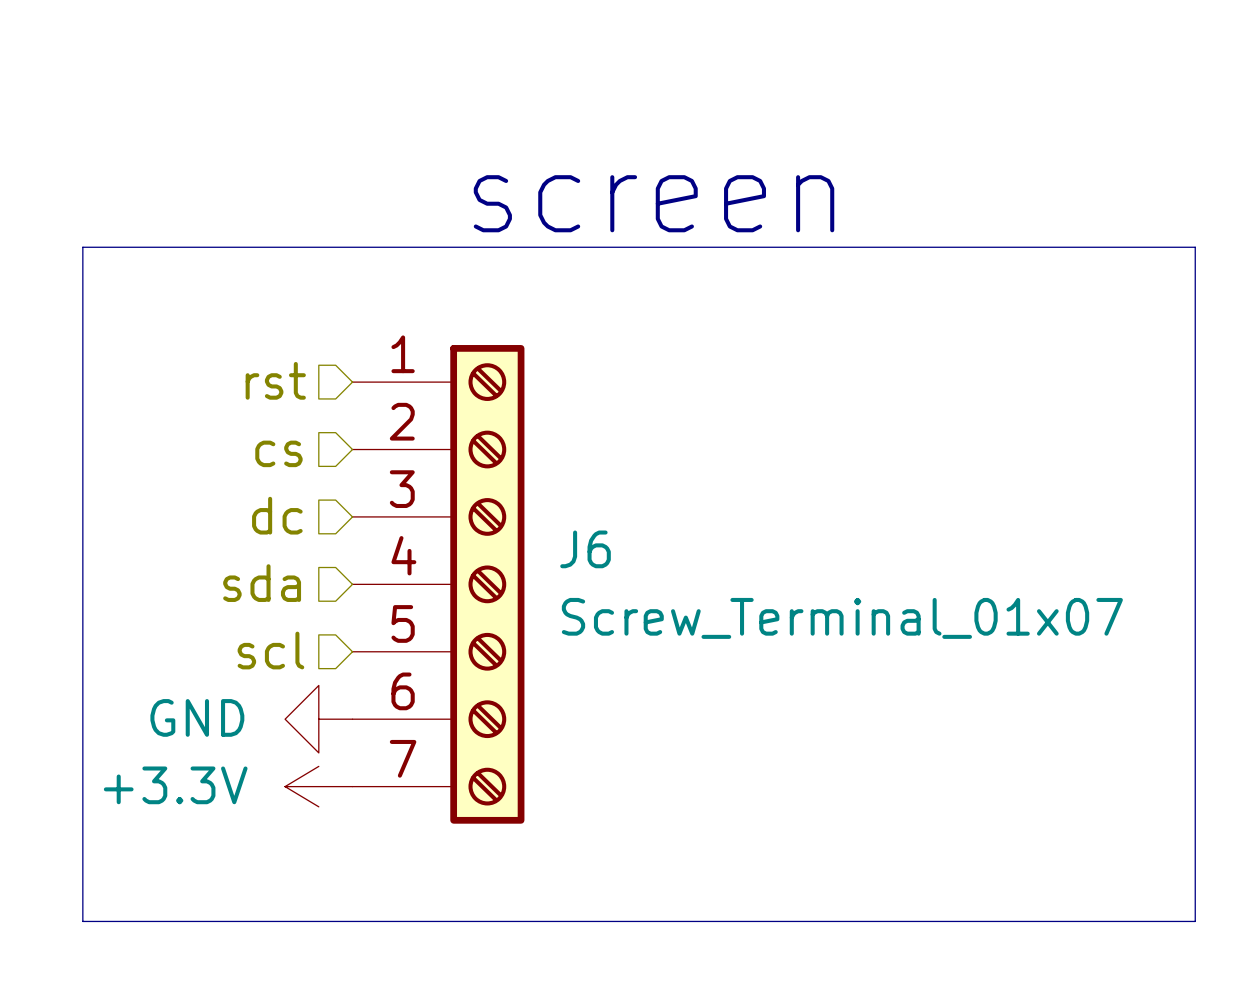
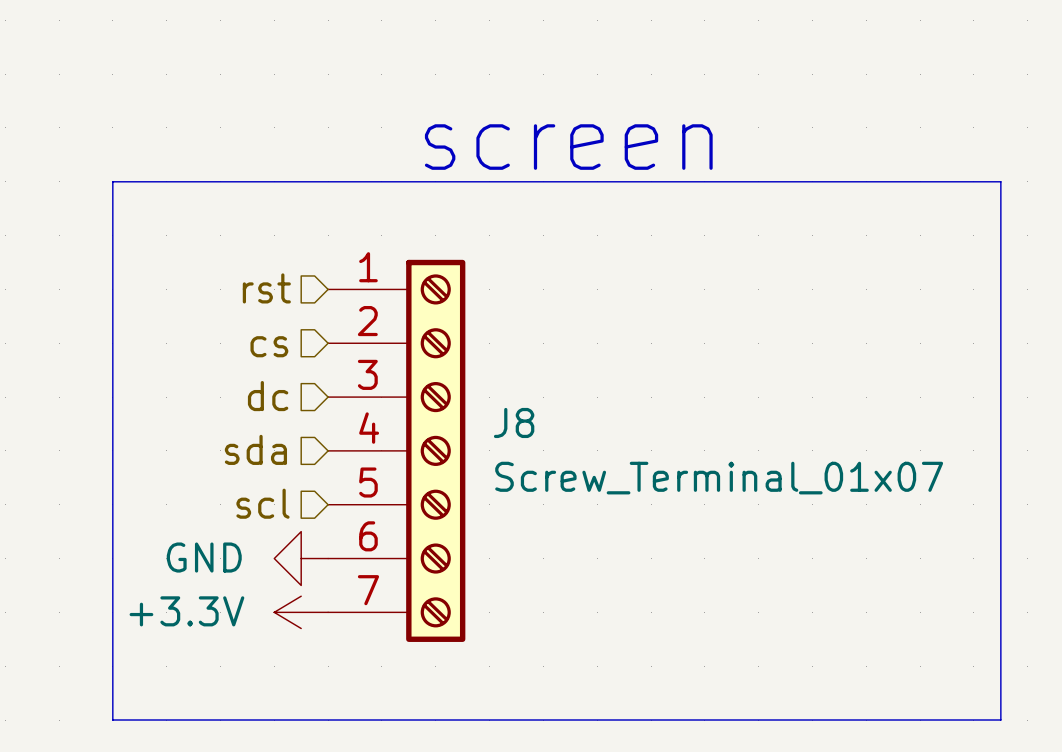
J6 name: J6 (585, 549) -> J8 (514, 422)

